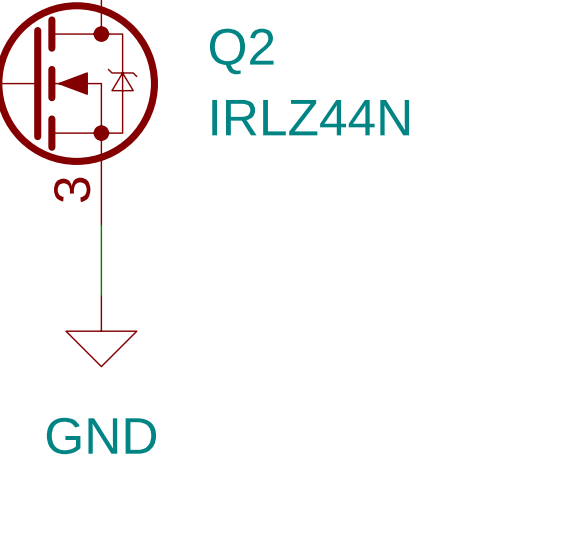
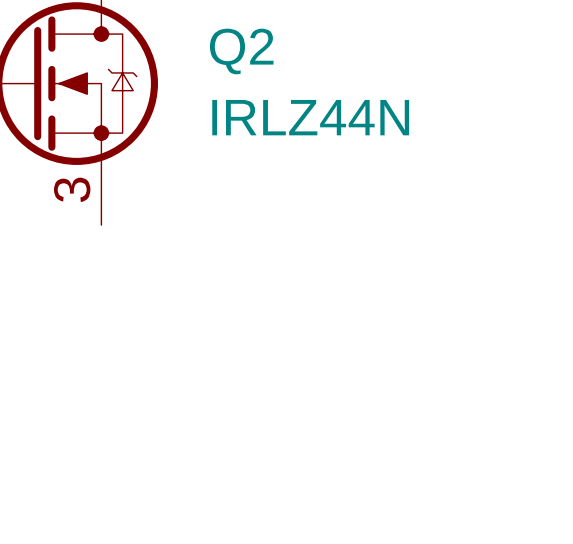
wire: (101, 225) (101, 295) -> none
power symbol: GND (101, 331) -> none

